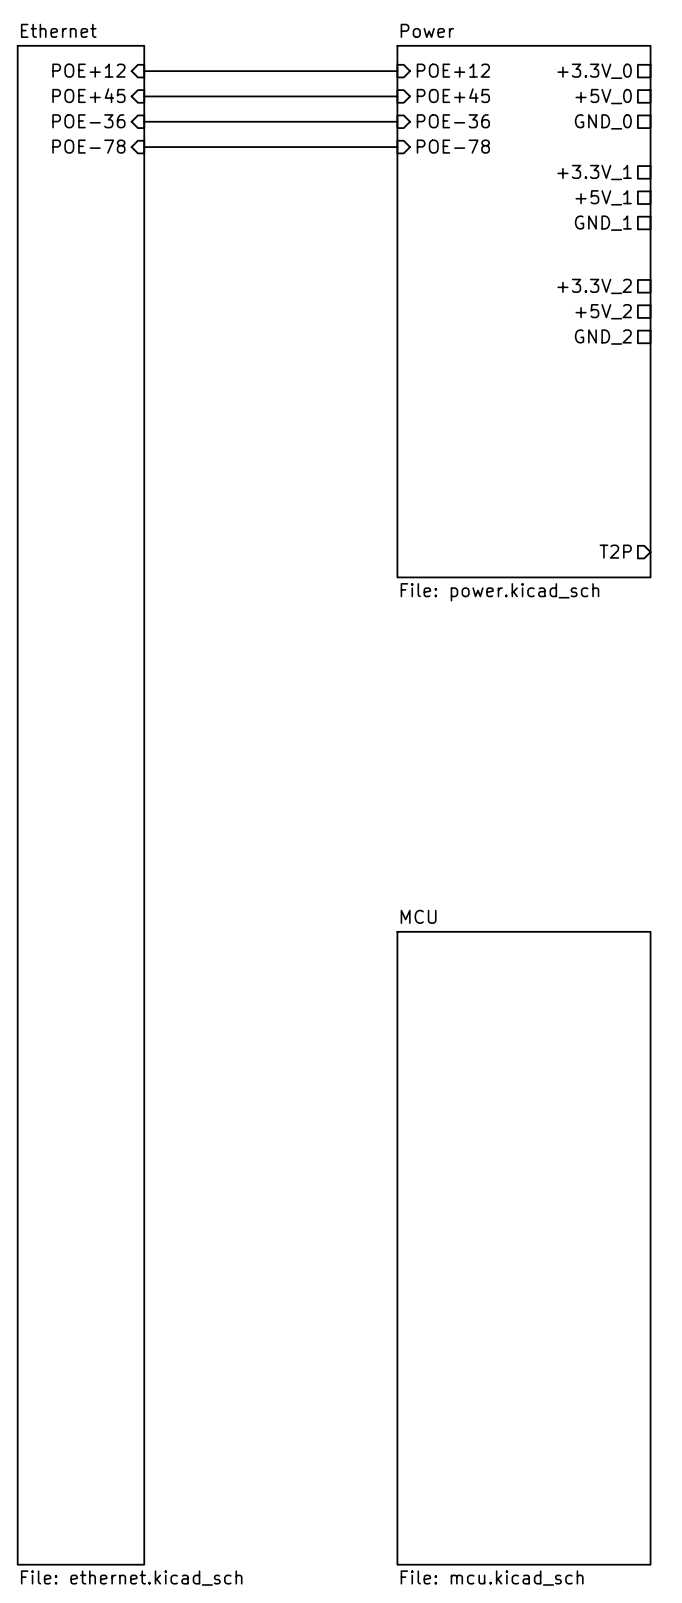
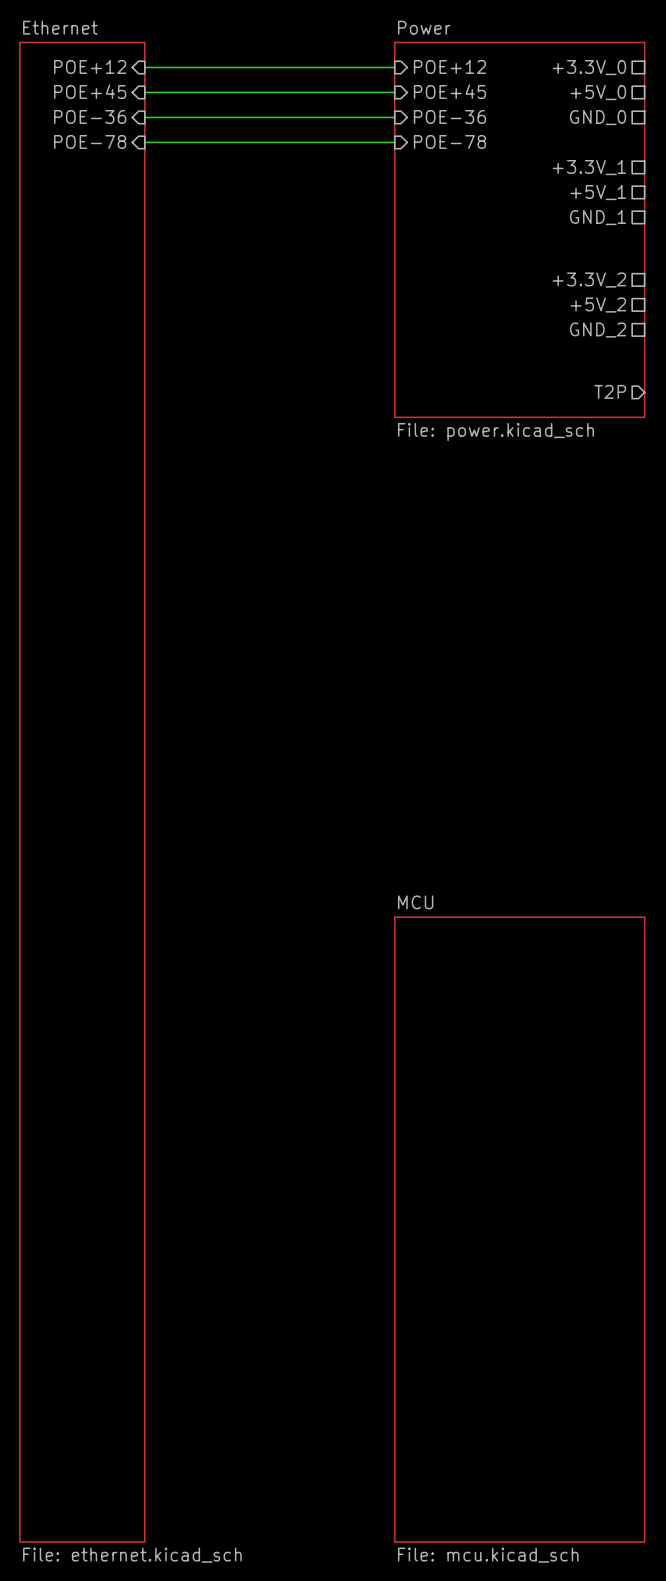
sheet Power: none -> File: power.kicad_sch (519, 229)
sheet Power: File: power.kicad_sch (523, 311) -> none
sheet pin position: T2P (615, 551) -> T2P (610, 391)

